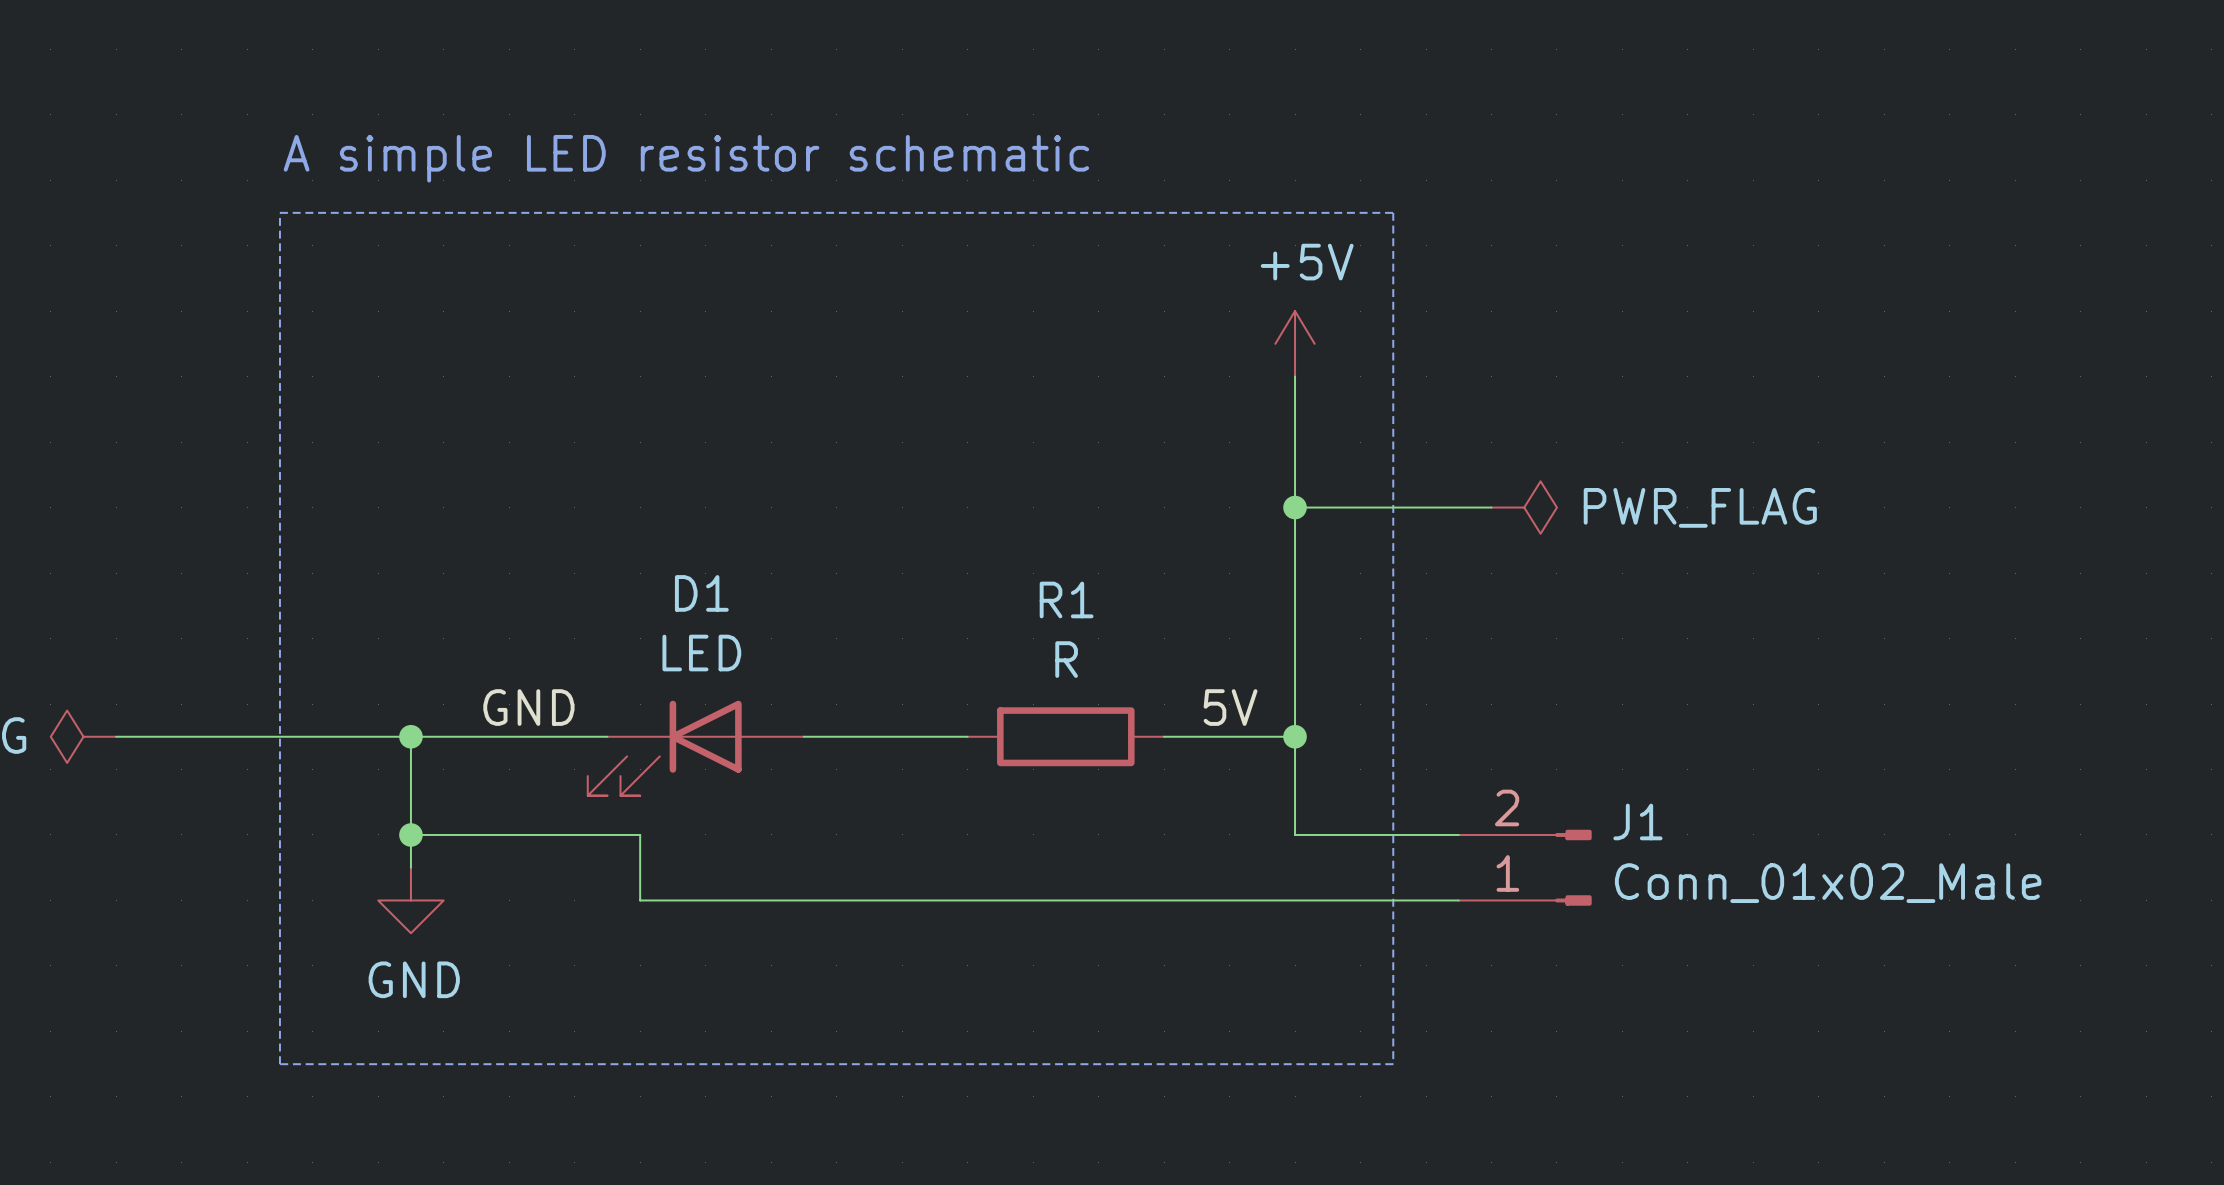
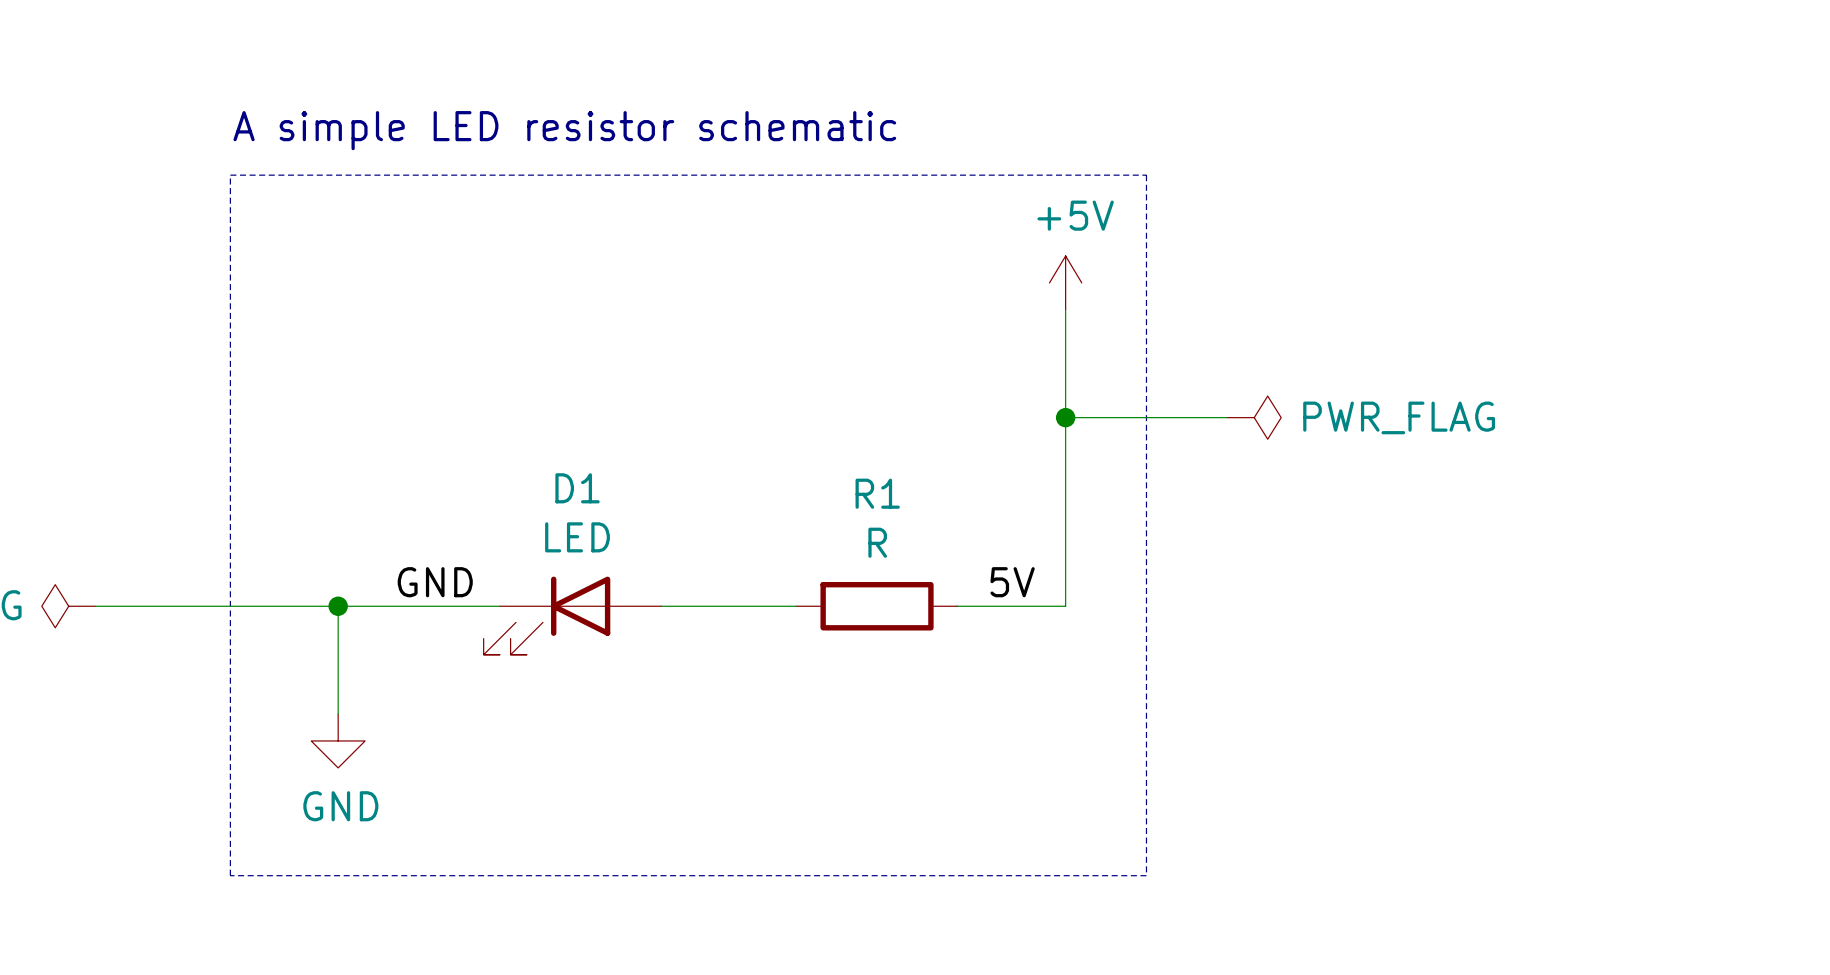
wire: (1295, 736) (1295, 834) (1458, 834) -> none
junction: (1295, 736) -> none
wire: (410, 834) (640, 834) (640, 900) (1458, 900) -> none
junction: (410, 834) -> none
J1: Conn_01x02_Male (1525, 867) -> none

